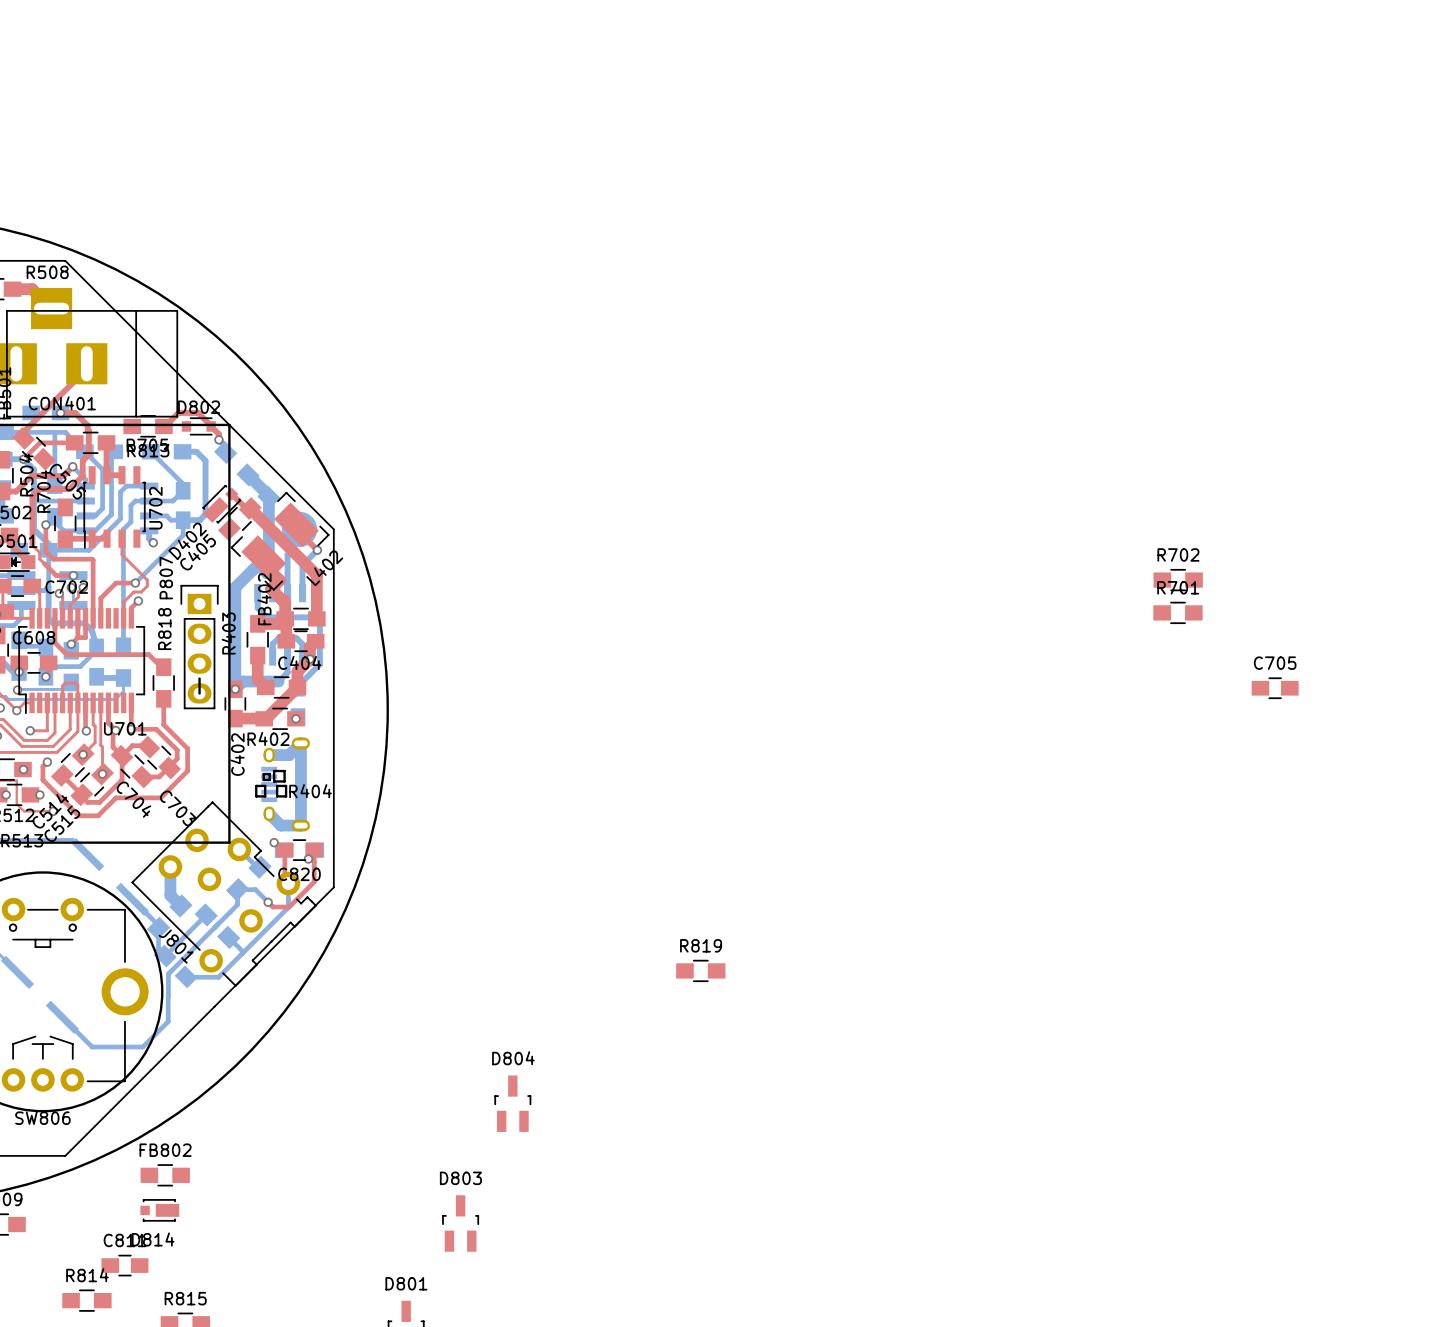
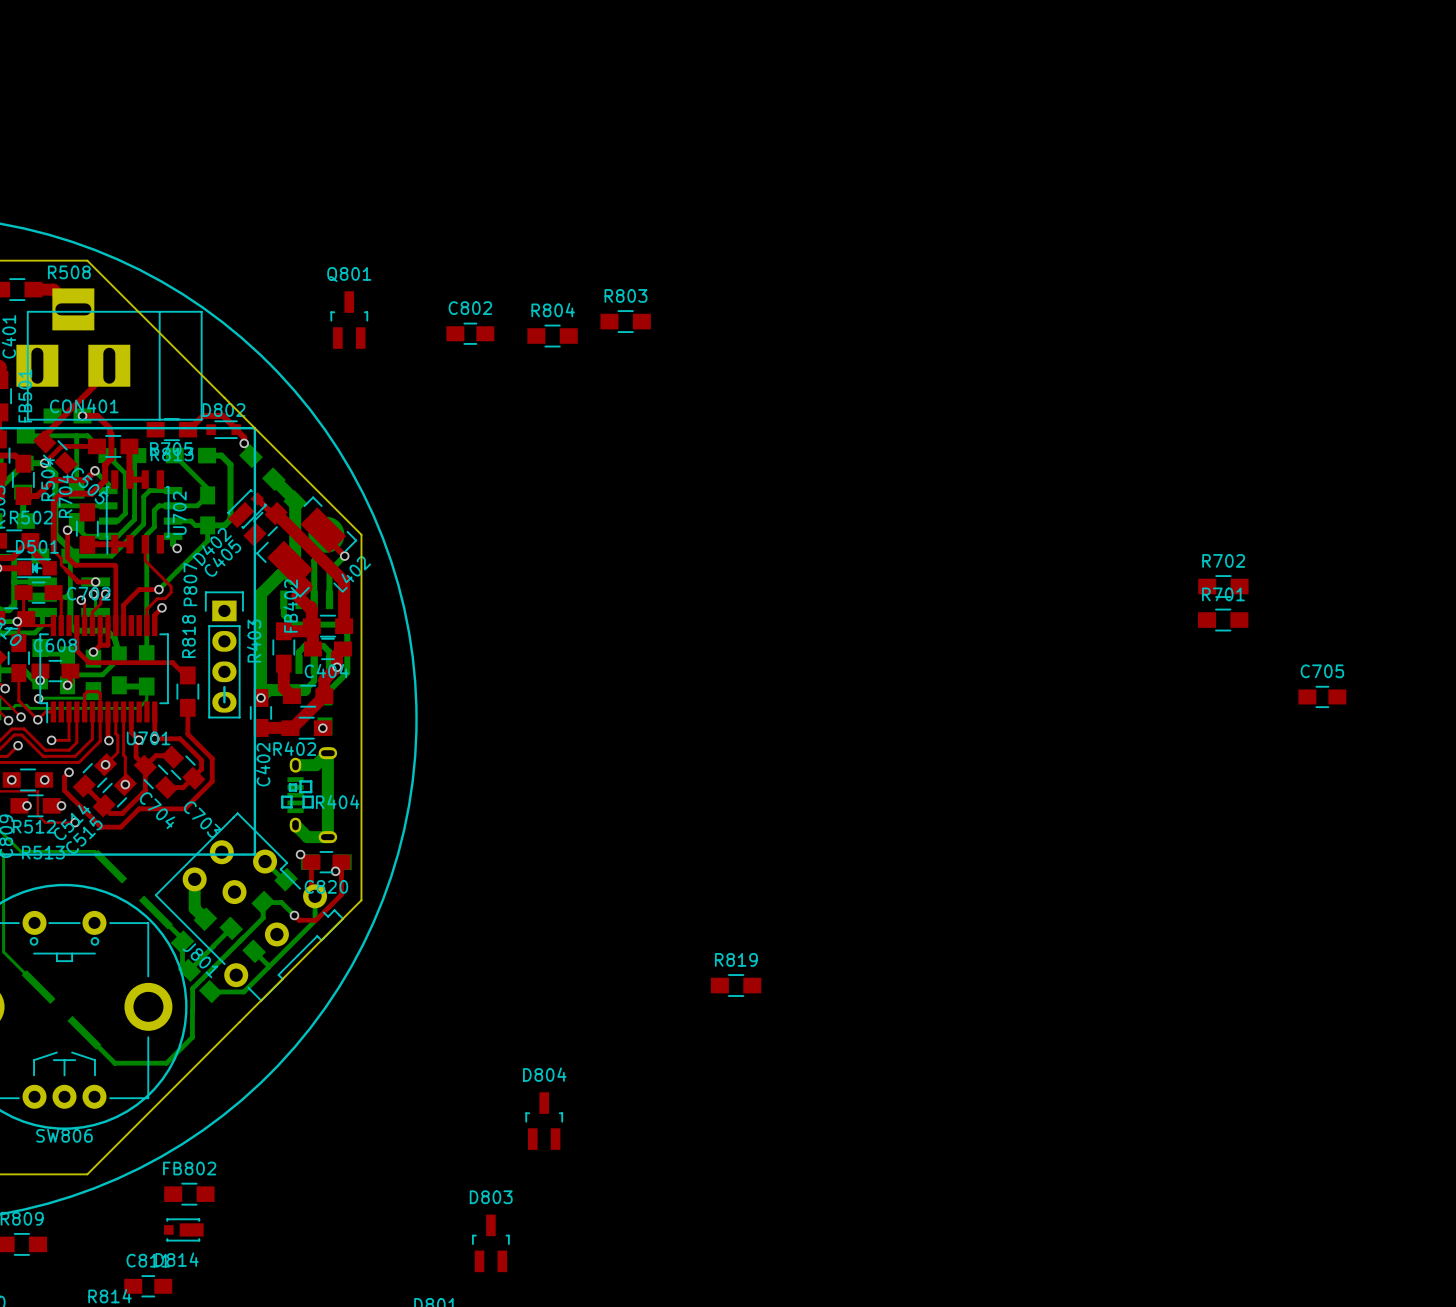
Q801: none -> (349, 320)
R803: none -> (625, 321)
C802: none -> (470, 333)
R804: none -> (552, 336)

